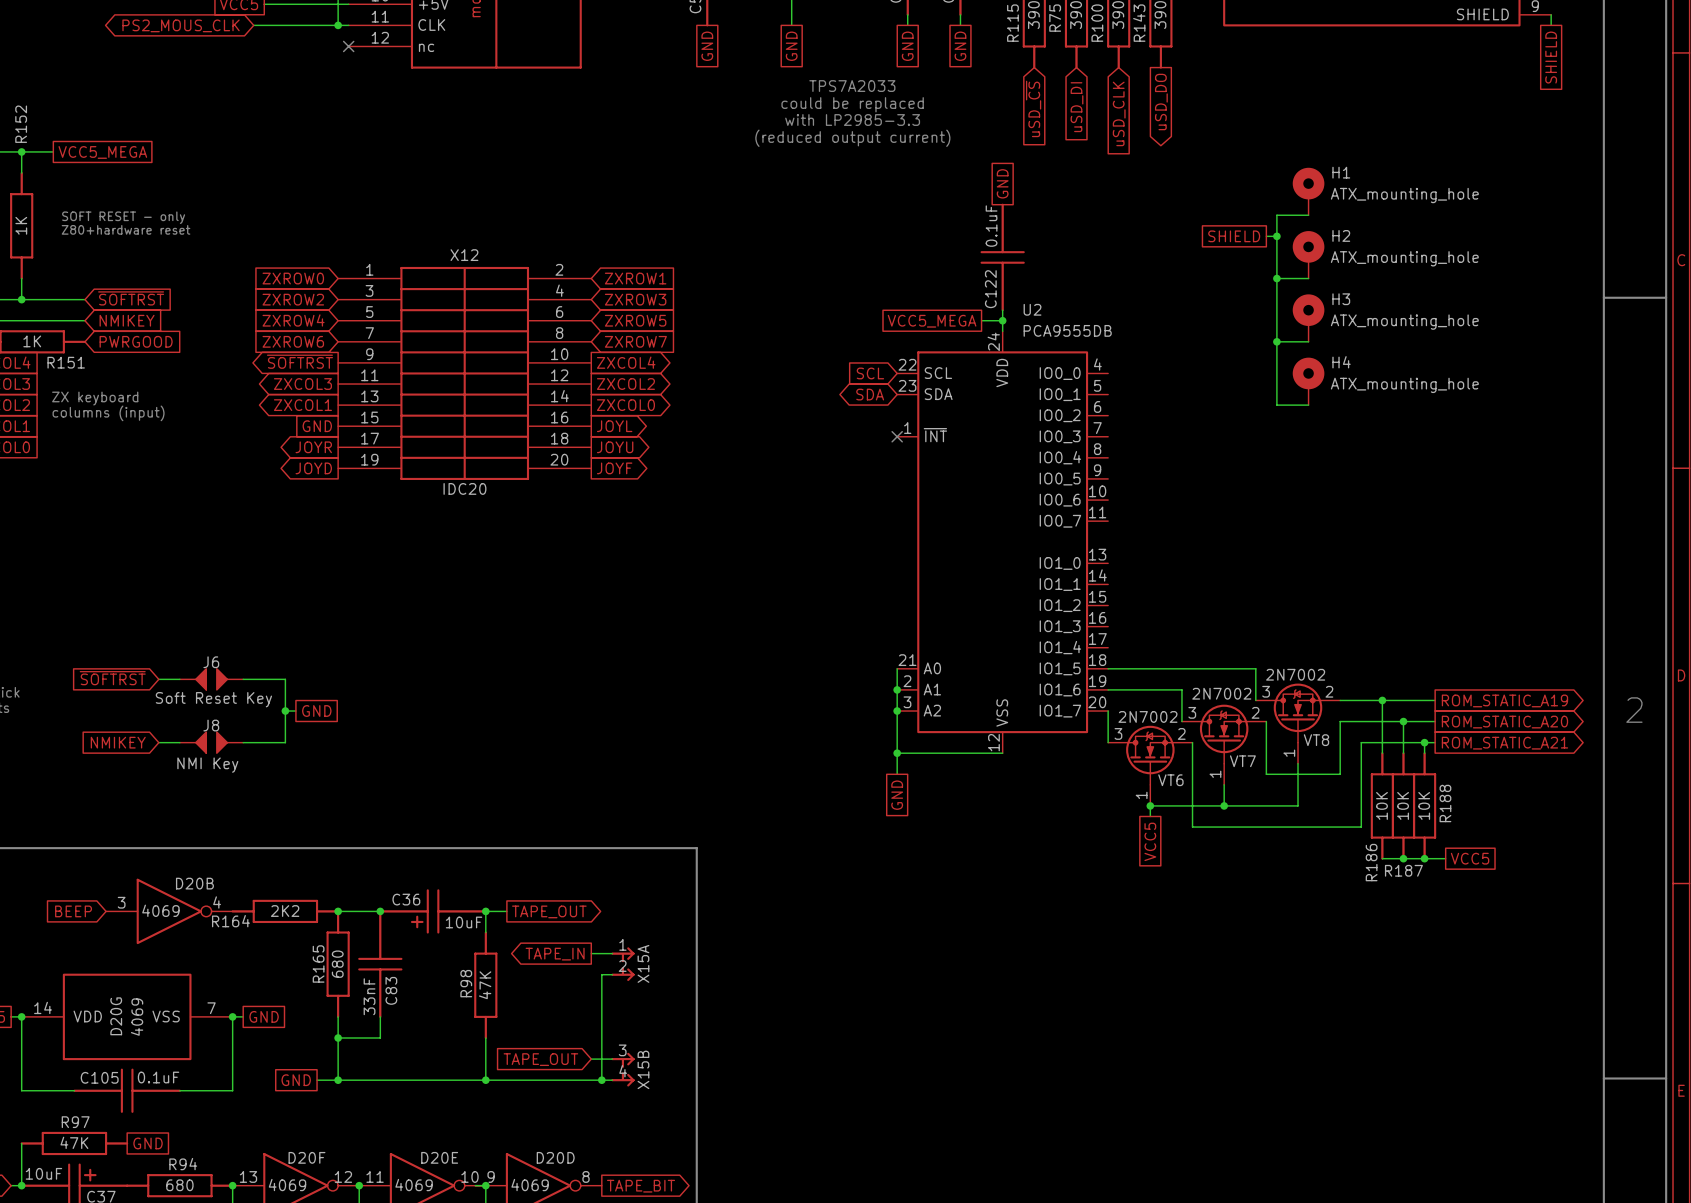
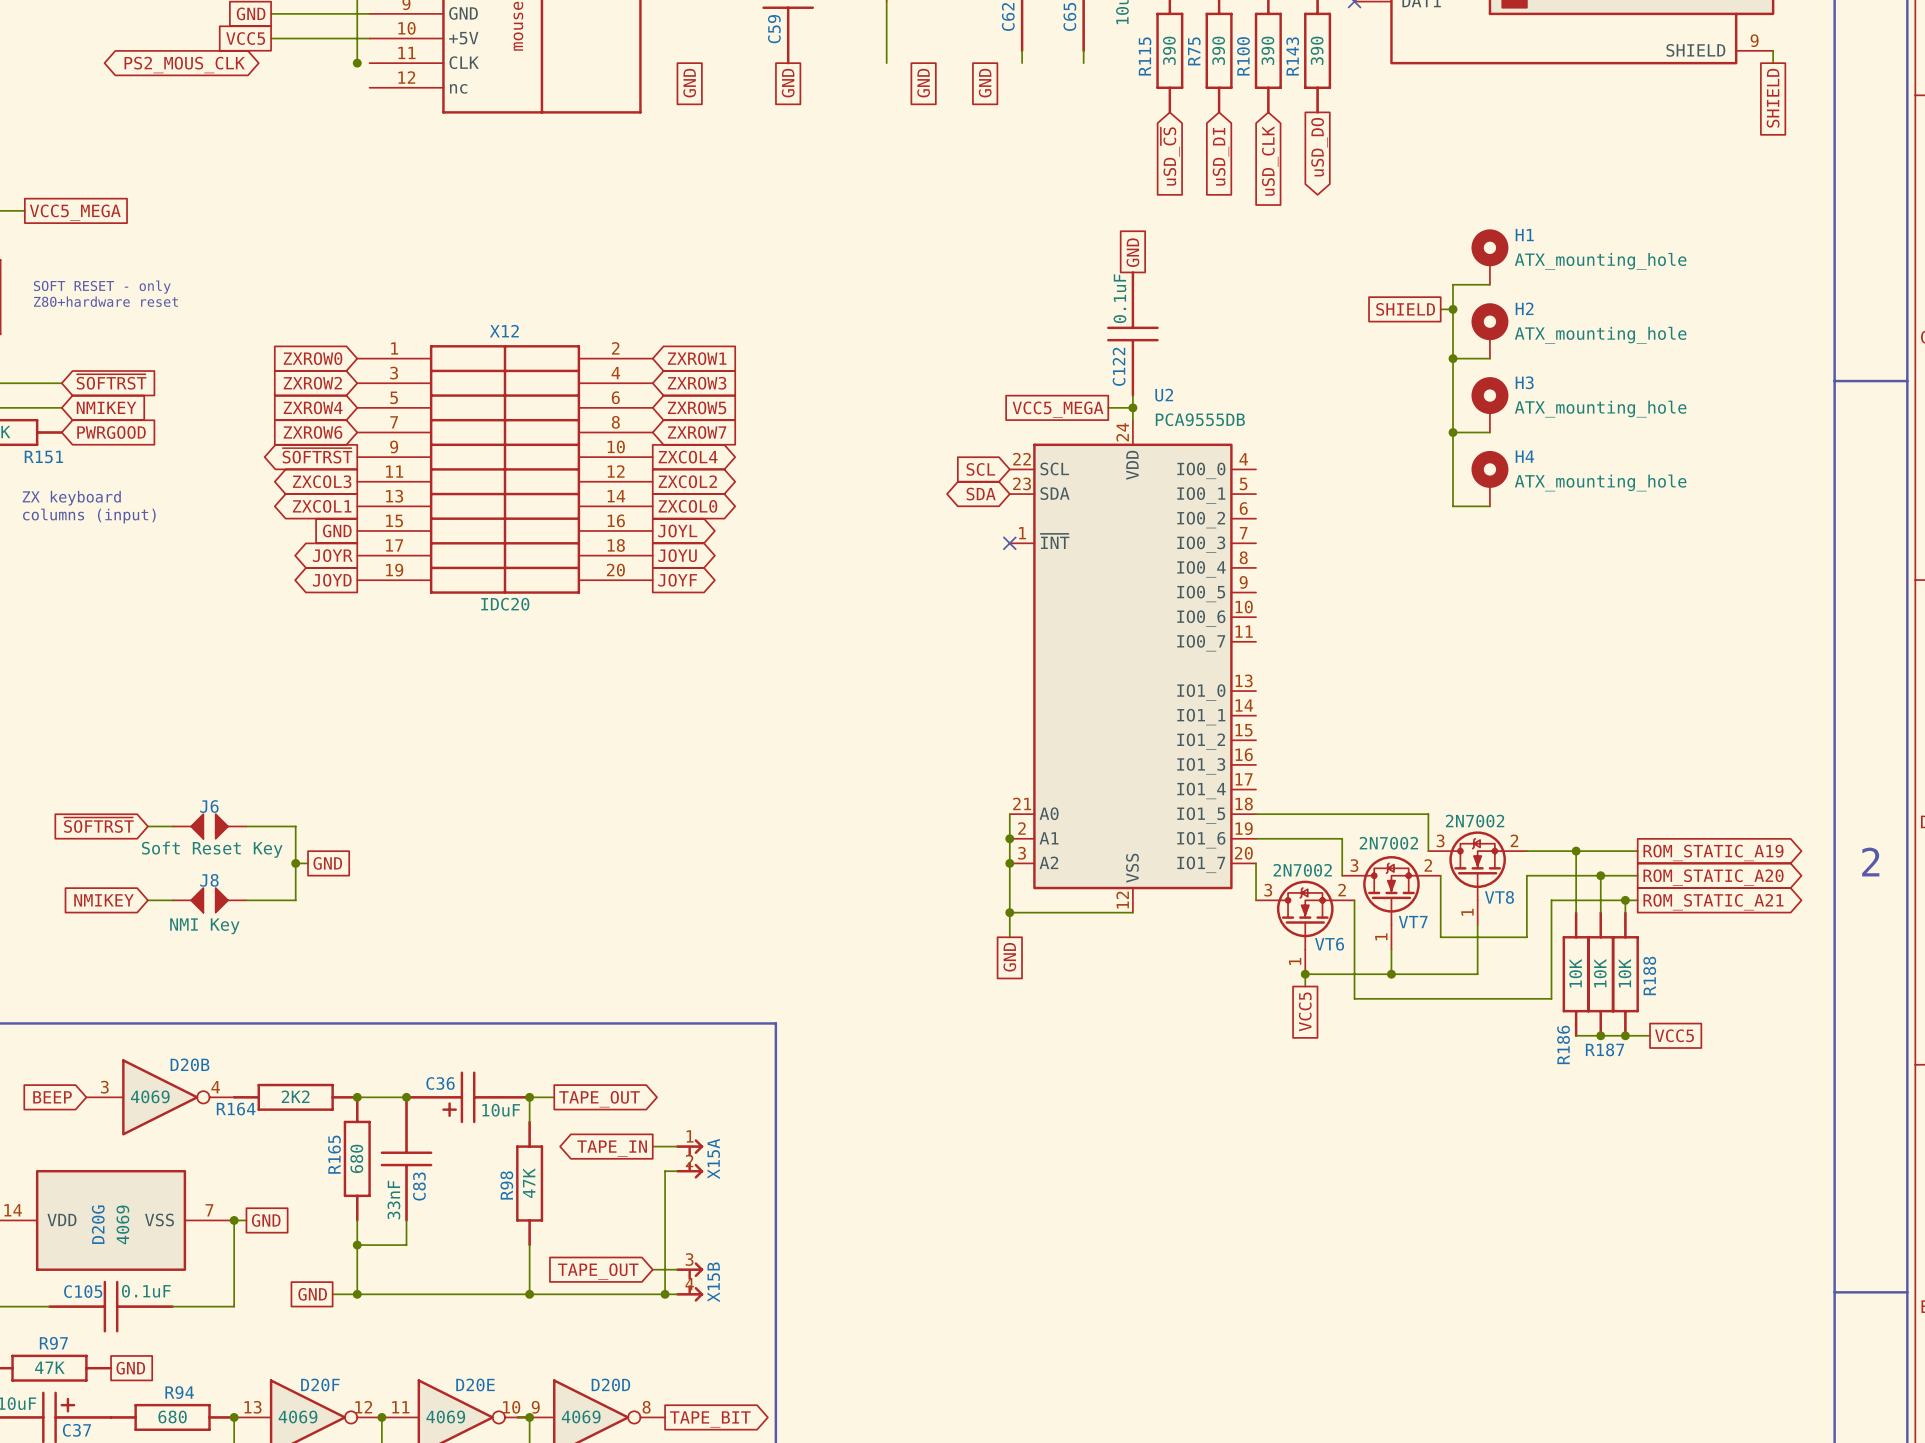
wire: (253, 25) (348, 25) -> none
no-connect mark: (348, 46) -> none
global label: none -> GND (689, 83)
global label position: GND (791, 46) -> GND (923, 83)
global label position: GND (907, 46) -> GND (985, 83)
global label: GND (960, 46) -> none
text: TPS7A2033 (852, 86) -> none
text: could be replaced (852, 104) -> none
text: with LP2985-3.3 (852, 120) -> none
text: (reduced output current) (852, 138) -> none

